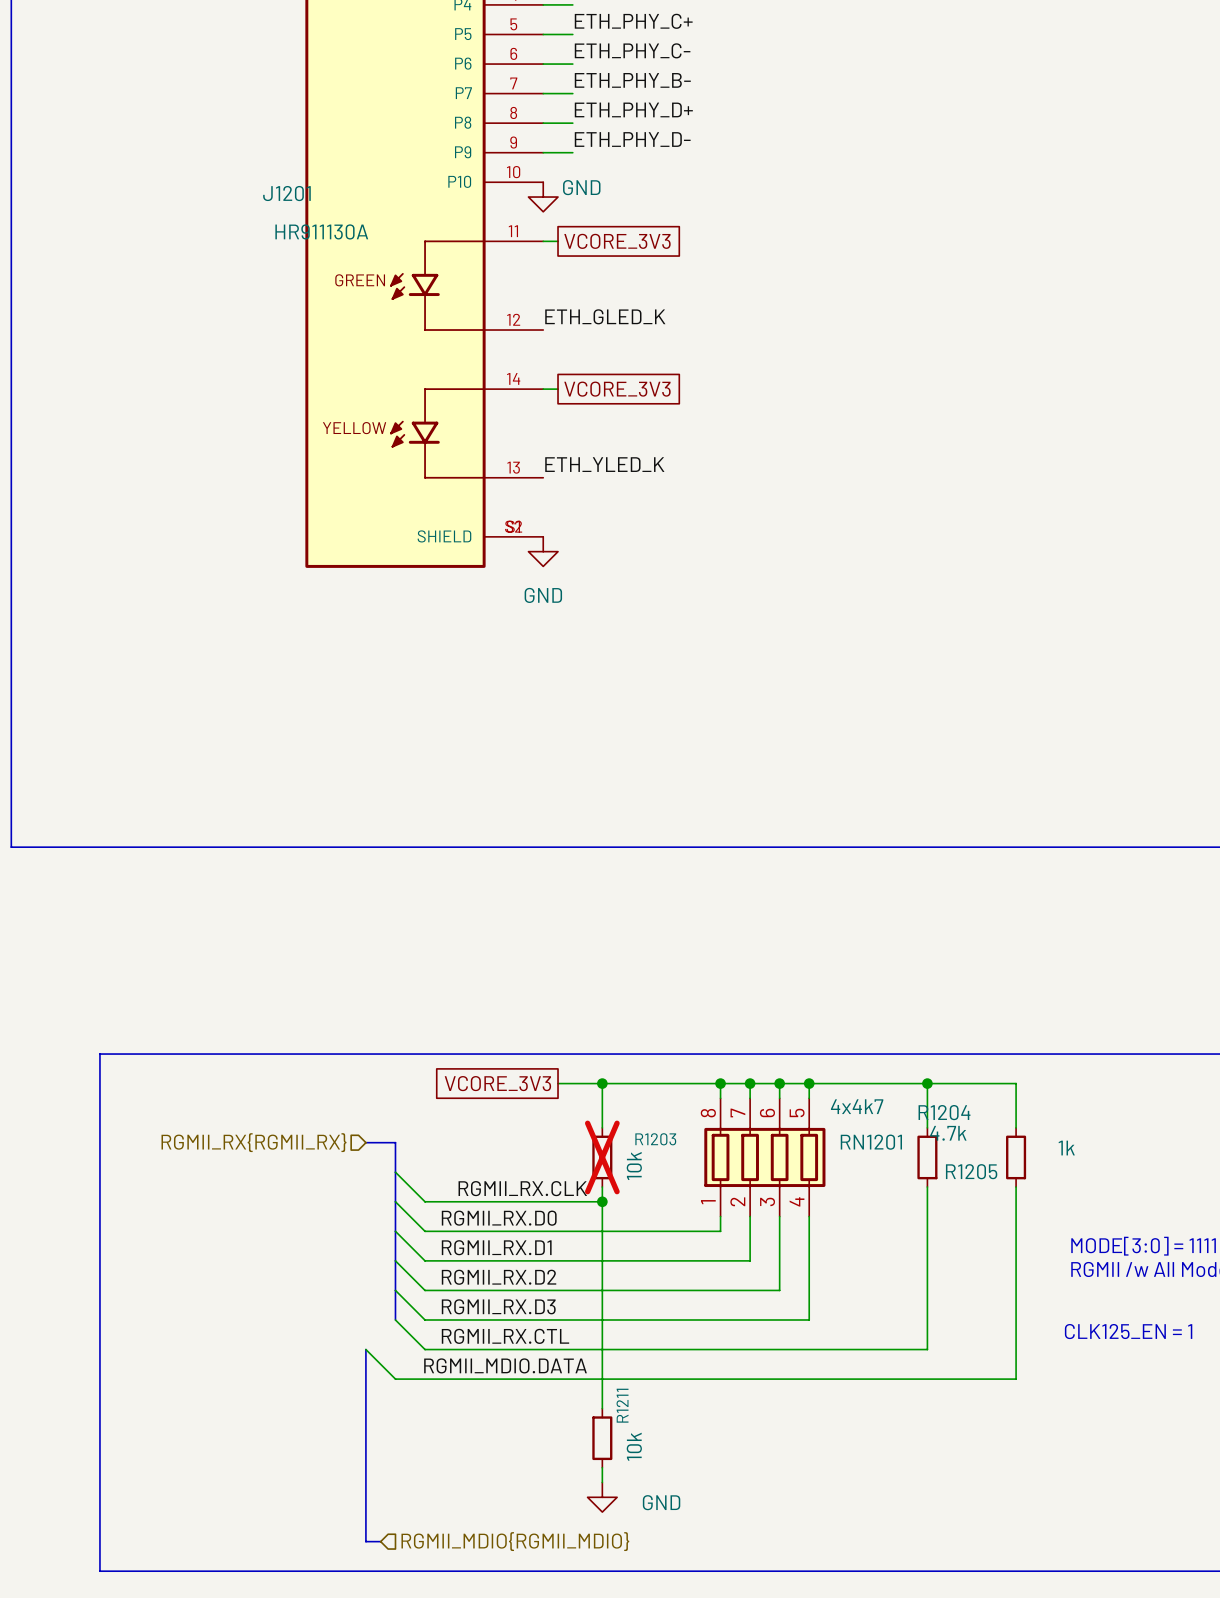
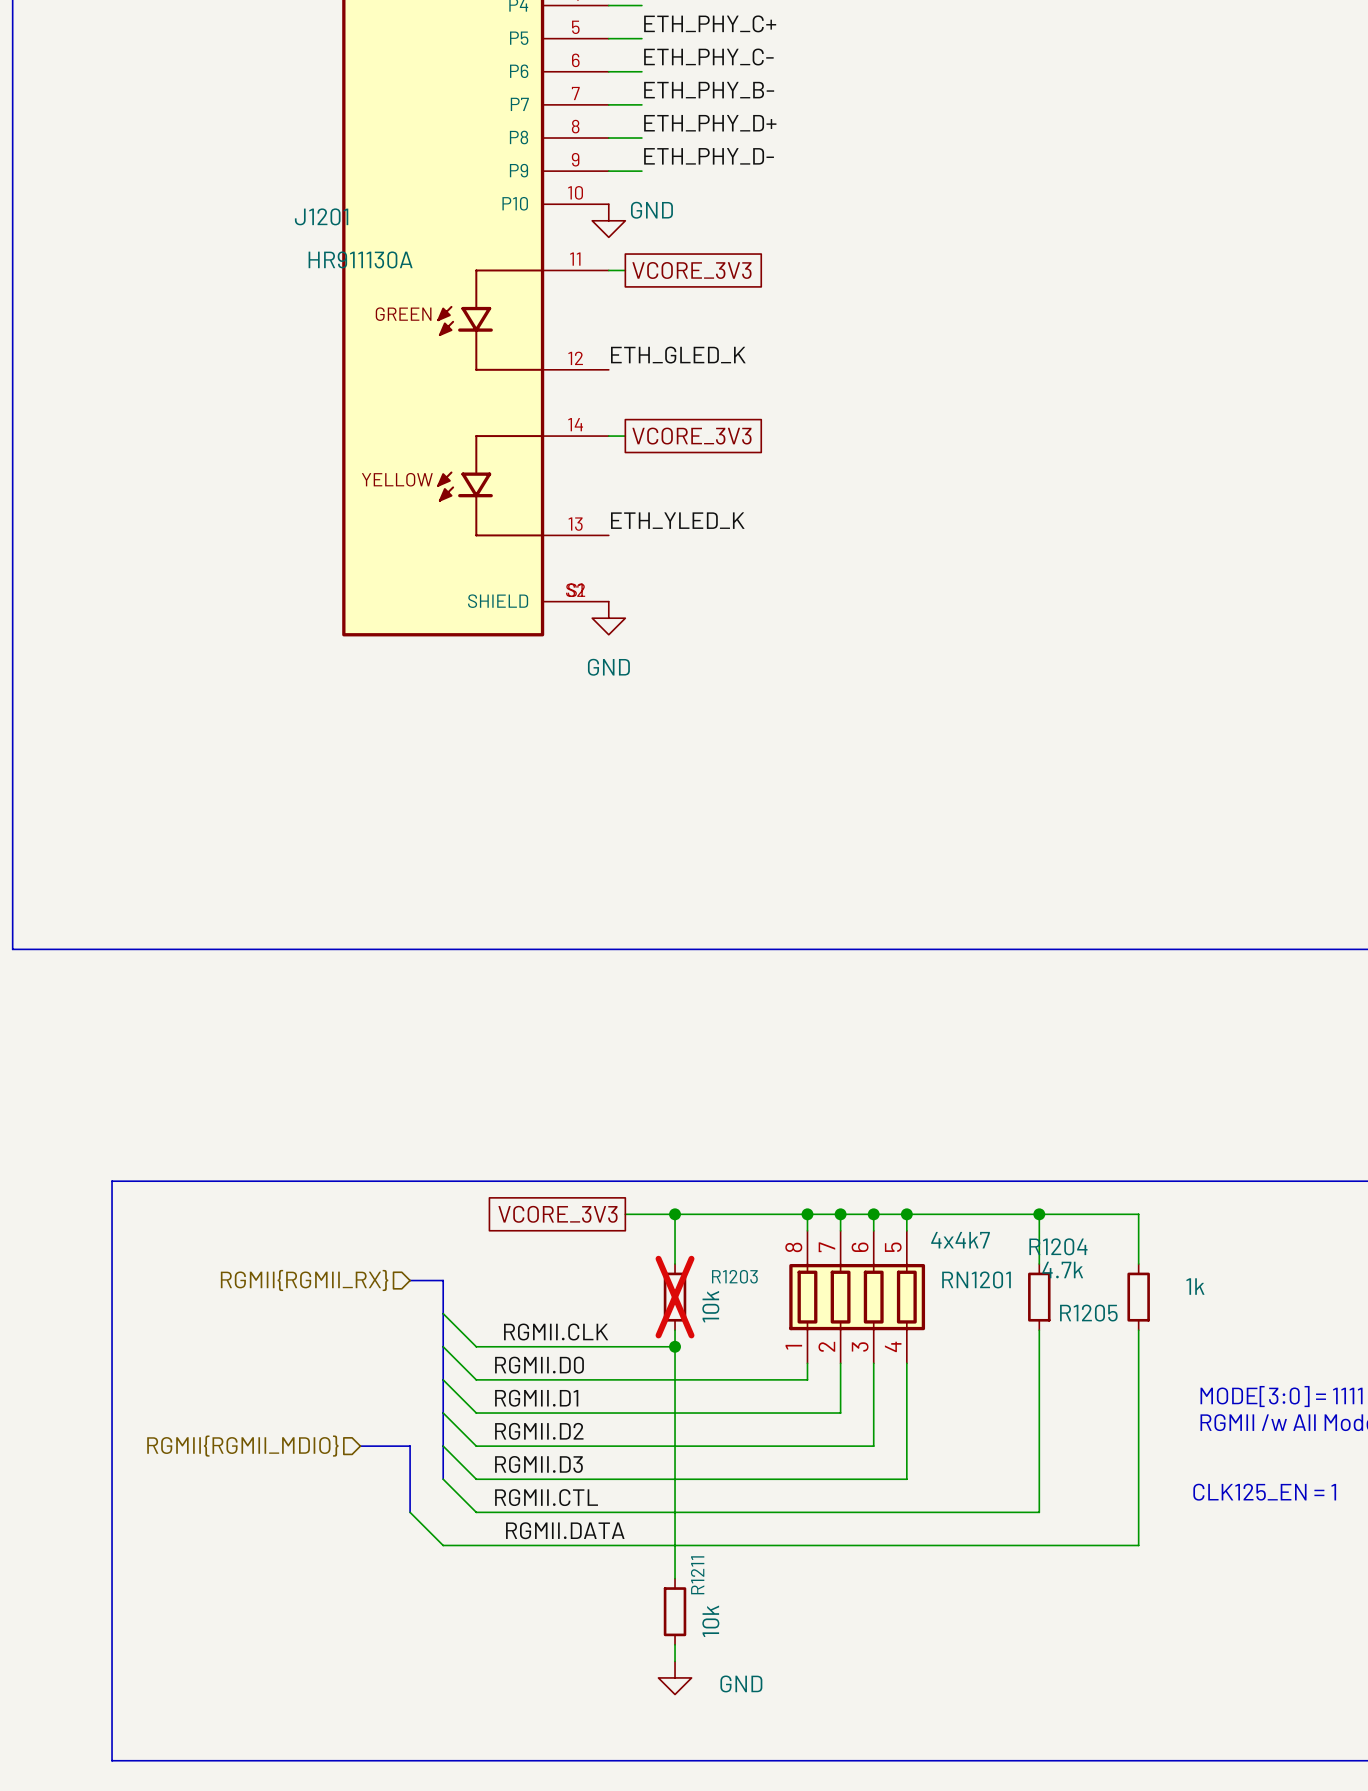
hierarchical label: RGMII_RX{RGMII_RX} (253, 1142) -> RGMII{RGMII_RX} (304, 1280)
label: RGMII_RX.CLK (522, 1188) -> RGMII.CLK (556, 1332)
label: RGMII_RX.D0 (499, 1218) -> RGMII.D0 (539, 1365)
label: RGMII_RX.D1 (496, 1247) -> RGMII.D1 (536, 1398)
label: RGMII_RX.D2 (499, 1277) -> RGMII.D2 (539, 1431)
hierarchical label: none -> RGMII{RGMII_MDIO} (242, 1446)
label: RGMII_RX.D3 (498, 1306) -> RGMII.D3 (538, 1464)
label: RGMII_RX.CTL (505, 1336) -> RGMII.CTL (546, 1497)
bus: (365, 1349) (365, 1541) (380, 1541) -> (410, 1512) (410, 1446) (360, 1446)
label: RGMII_MDIO.DATA (505, 1365) -> RGMII.DATA (565, 1530)
hierarchical label: RGMII_MDIO{RGMII_MDIO} (515, 1541) -> none

